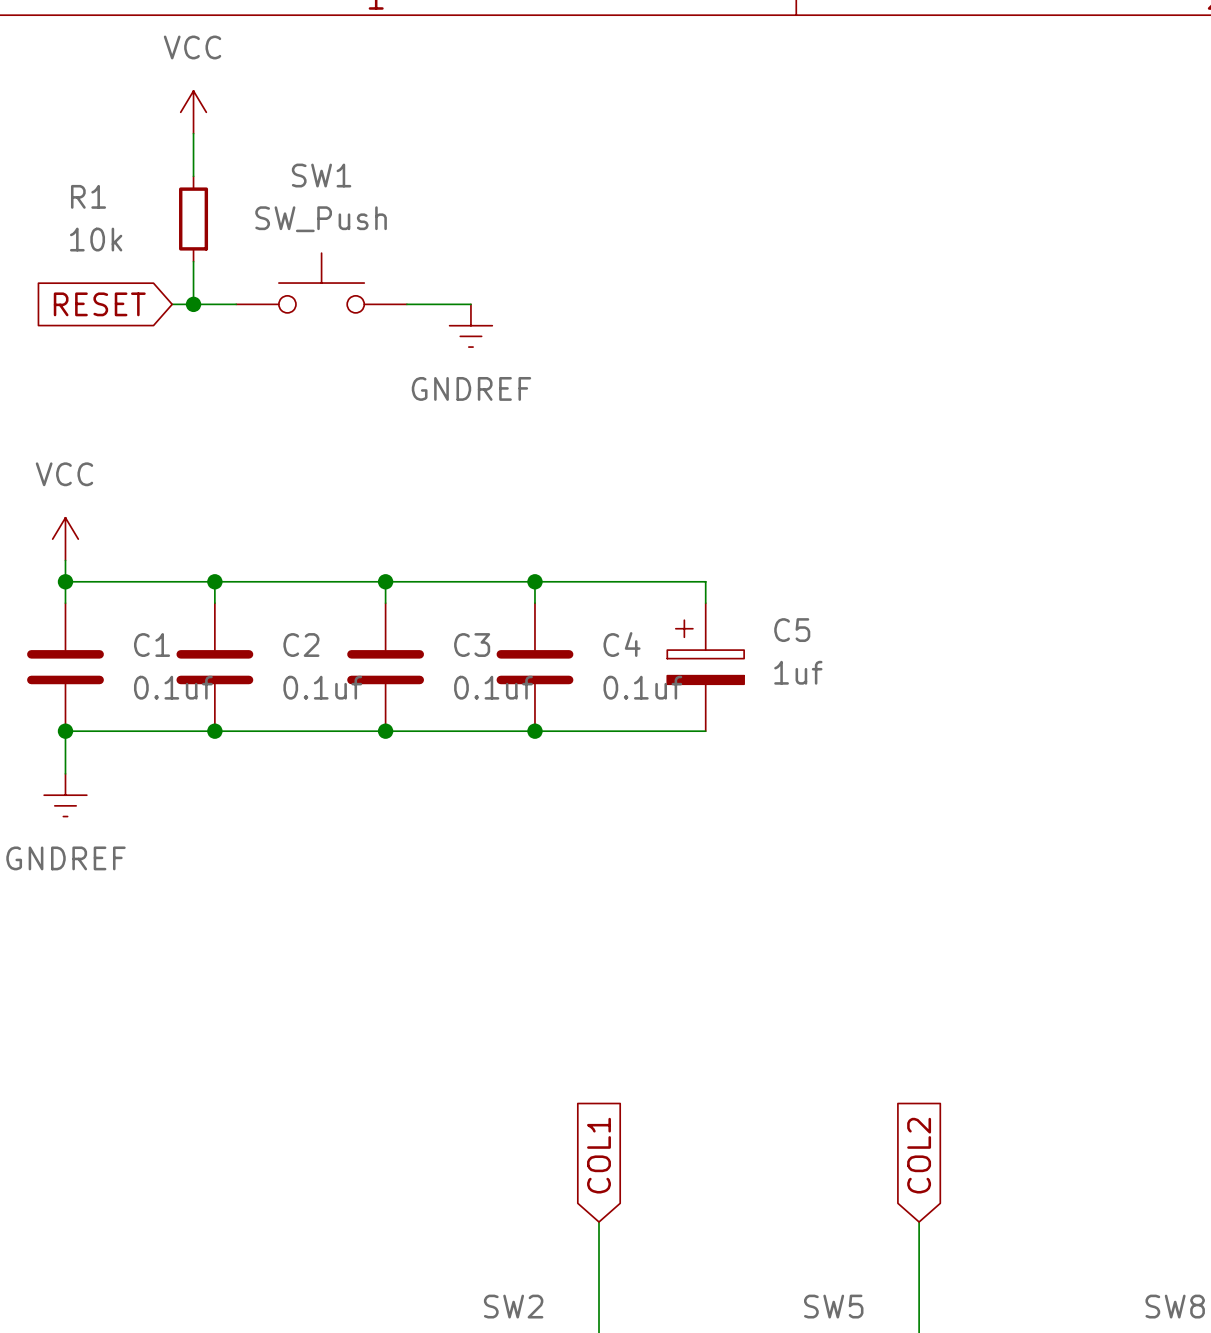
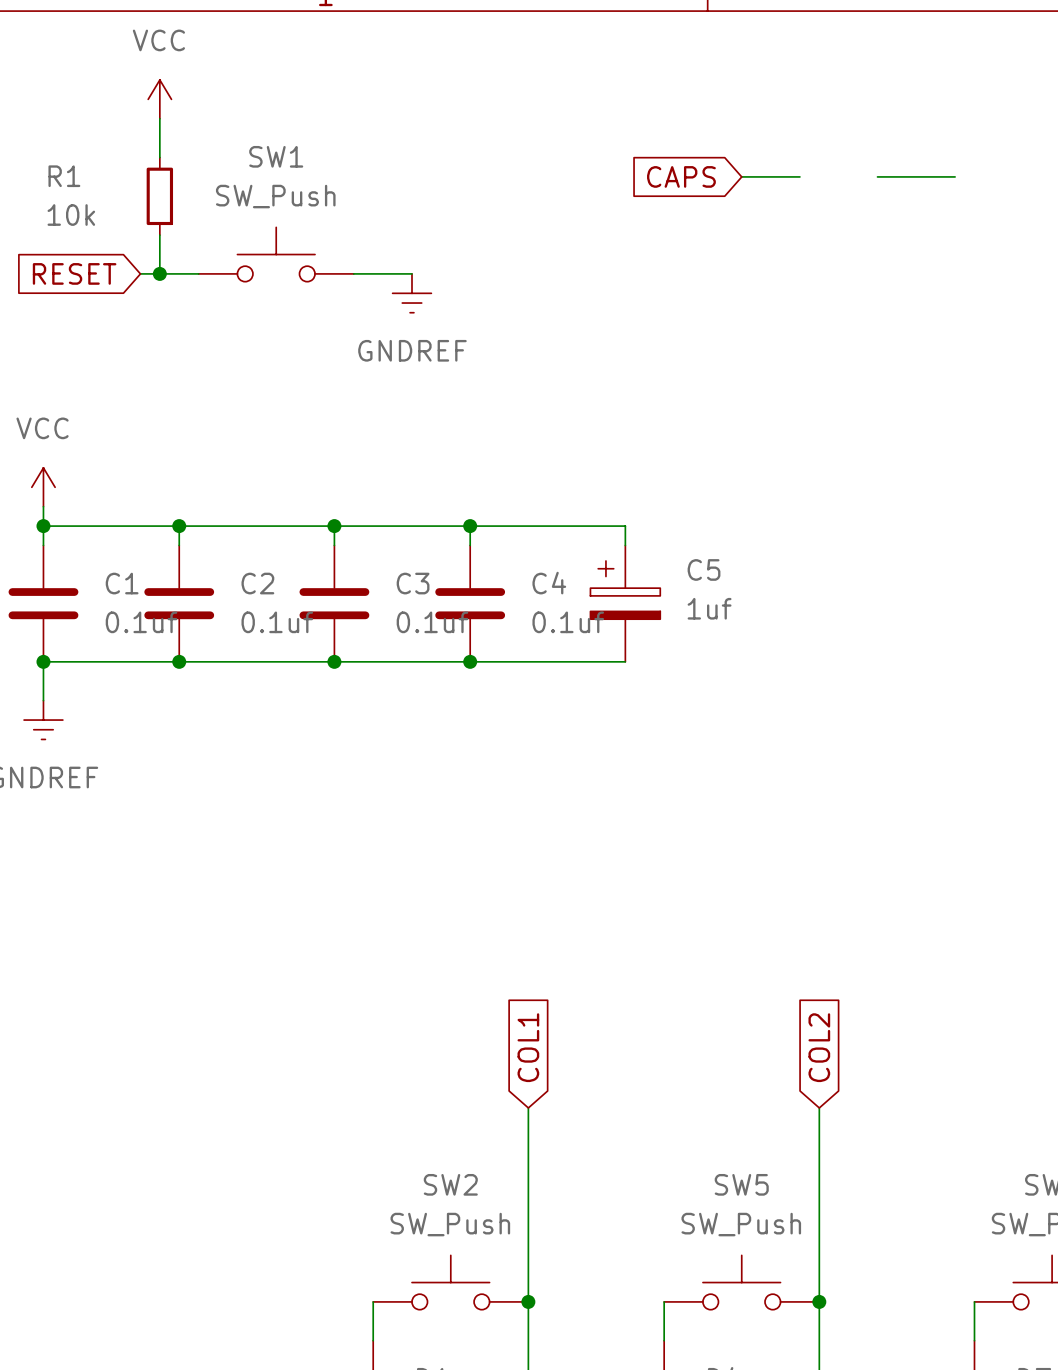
global label: none -> CAPS (681, 176)
wire: none -> (741, 176) (799, 176)
wire: none -> (877, 176) (955, 176)

